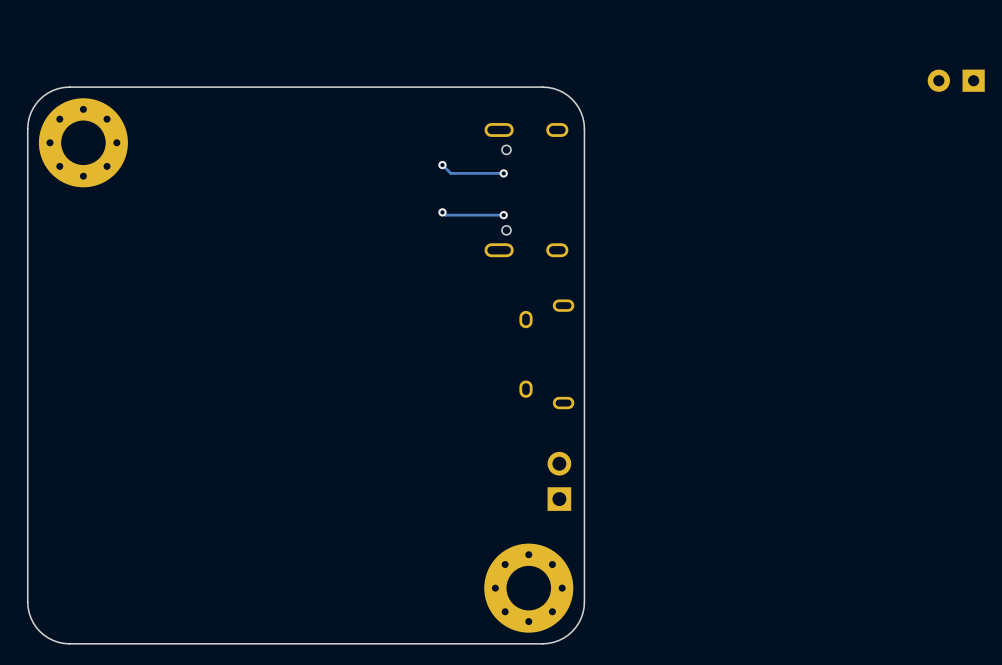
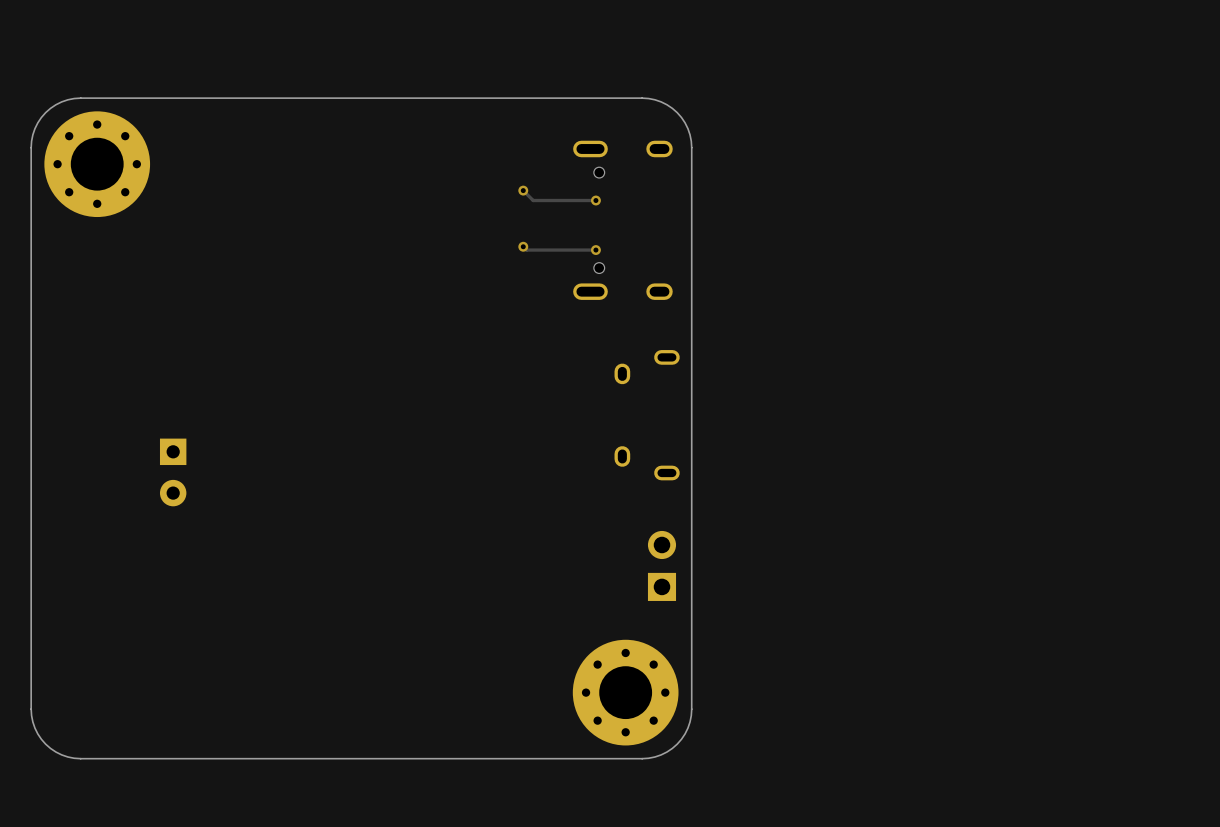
part: (956, 80) -> none
part: none -> (173, 472)

